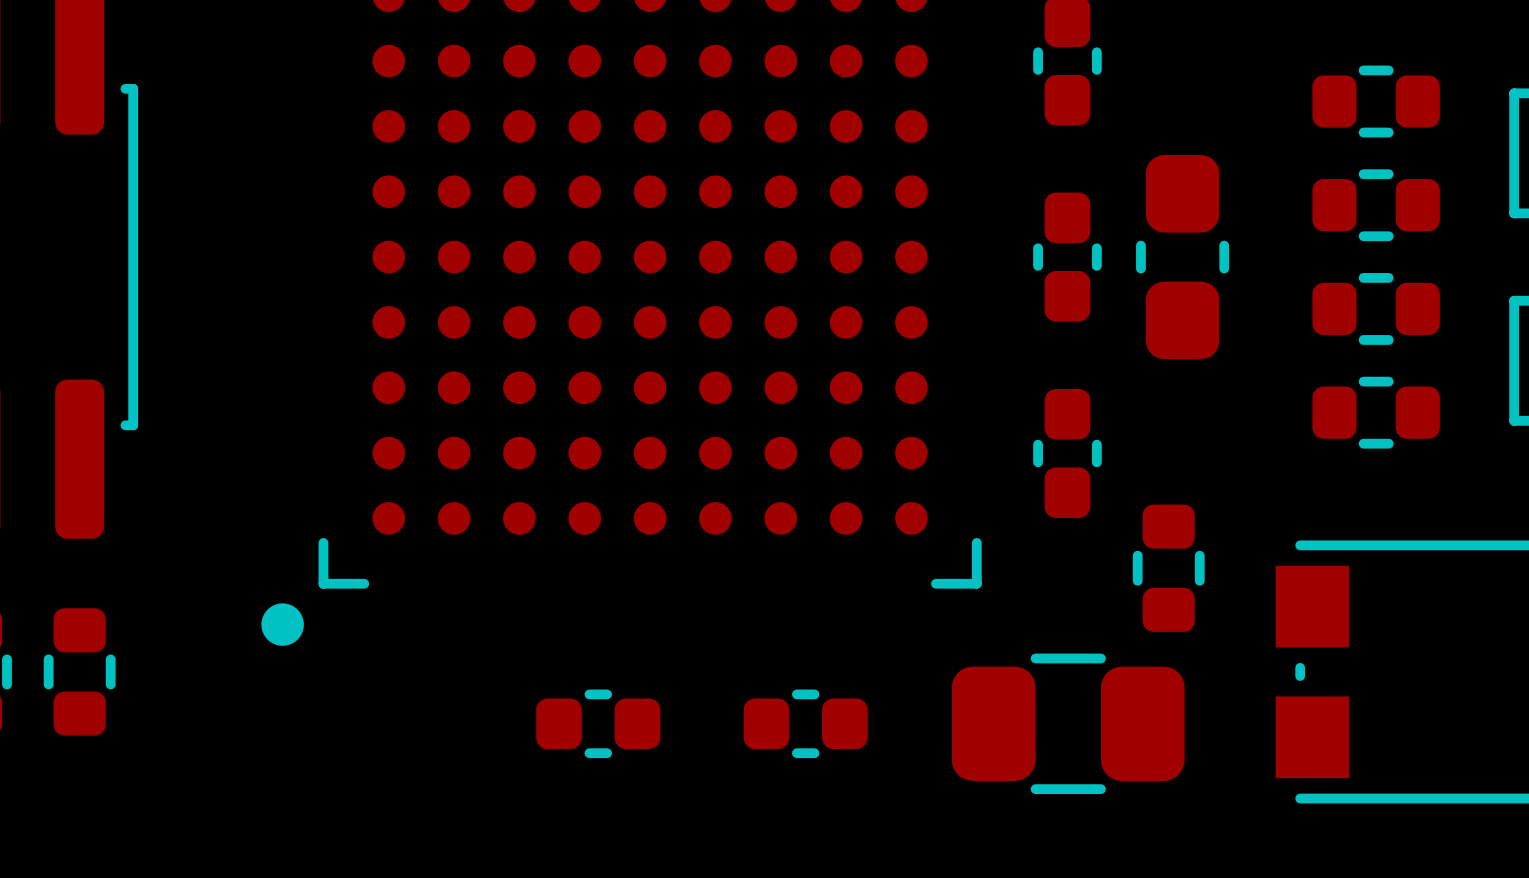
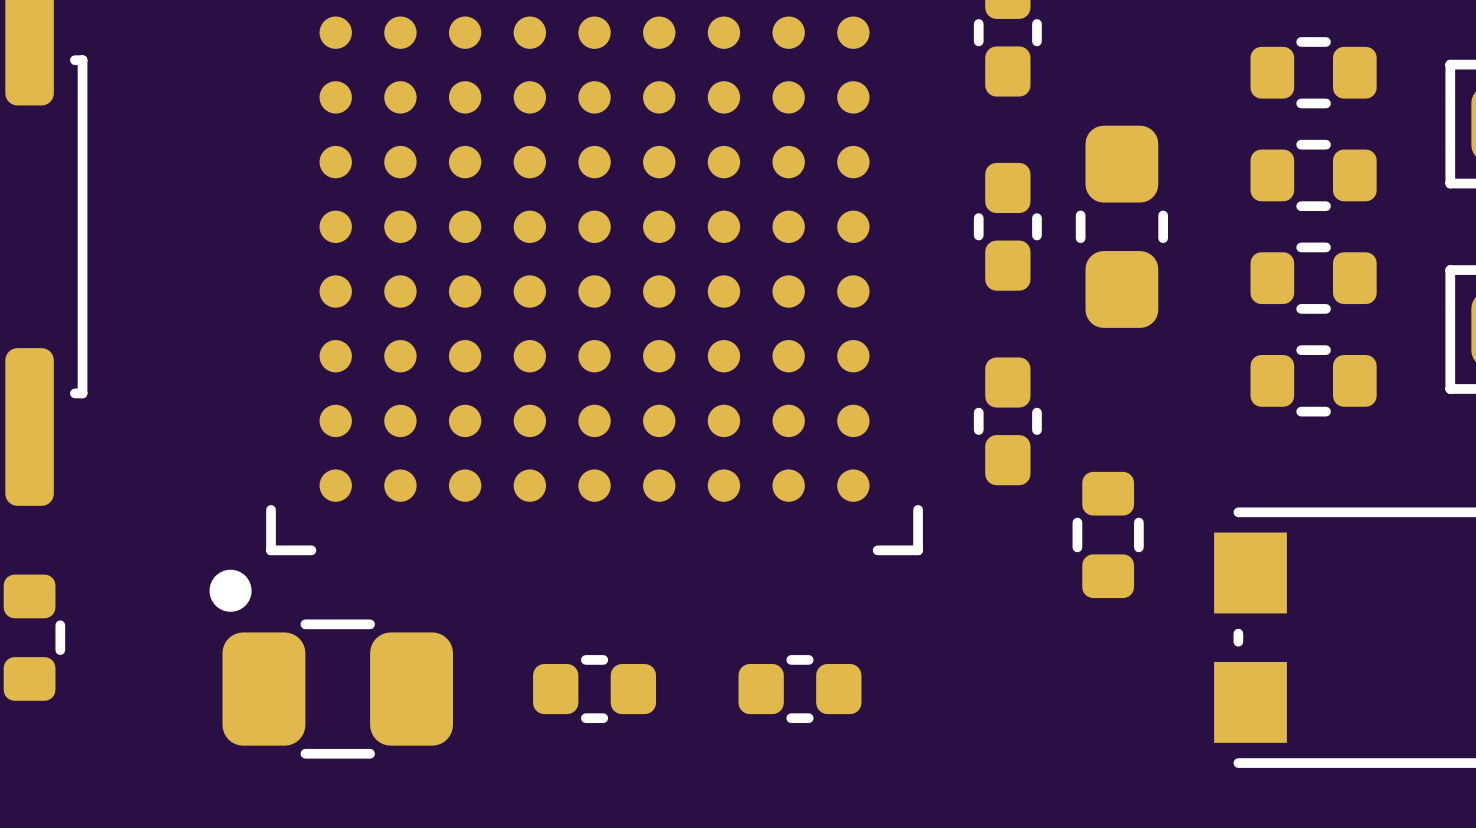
part position: (598, 723) -> (594, 689)
part position: (805, 723) -> (799, 689)
part position: (1068, 723) -> (337, 689)

